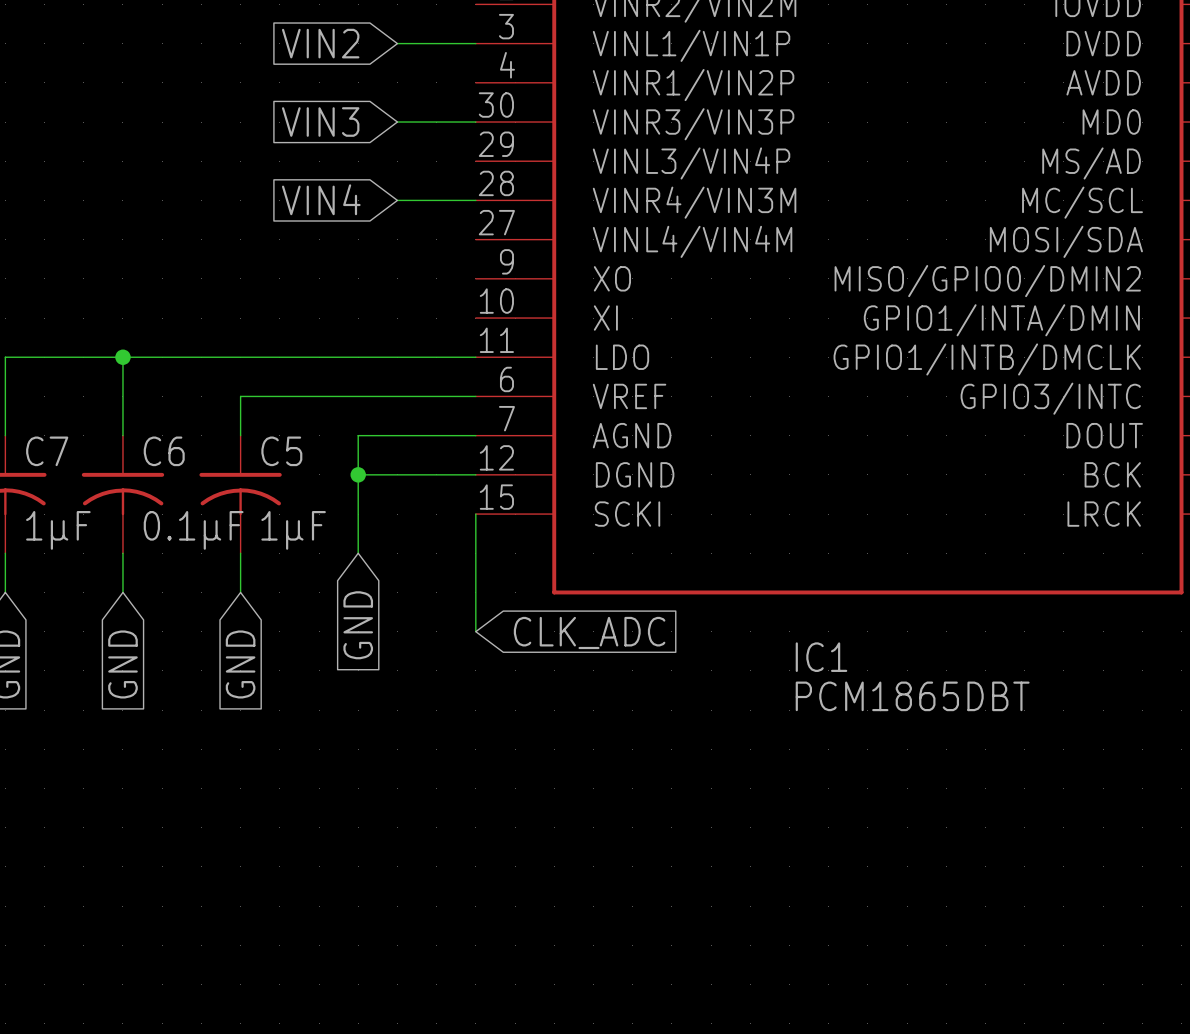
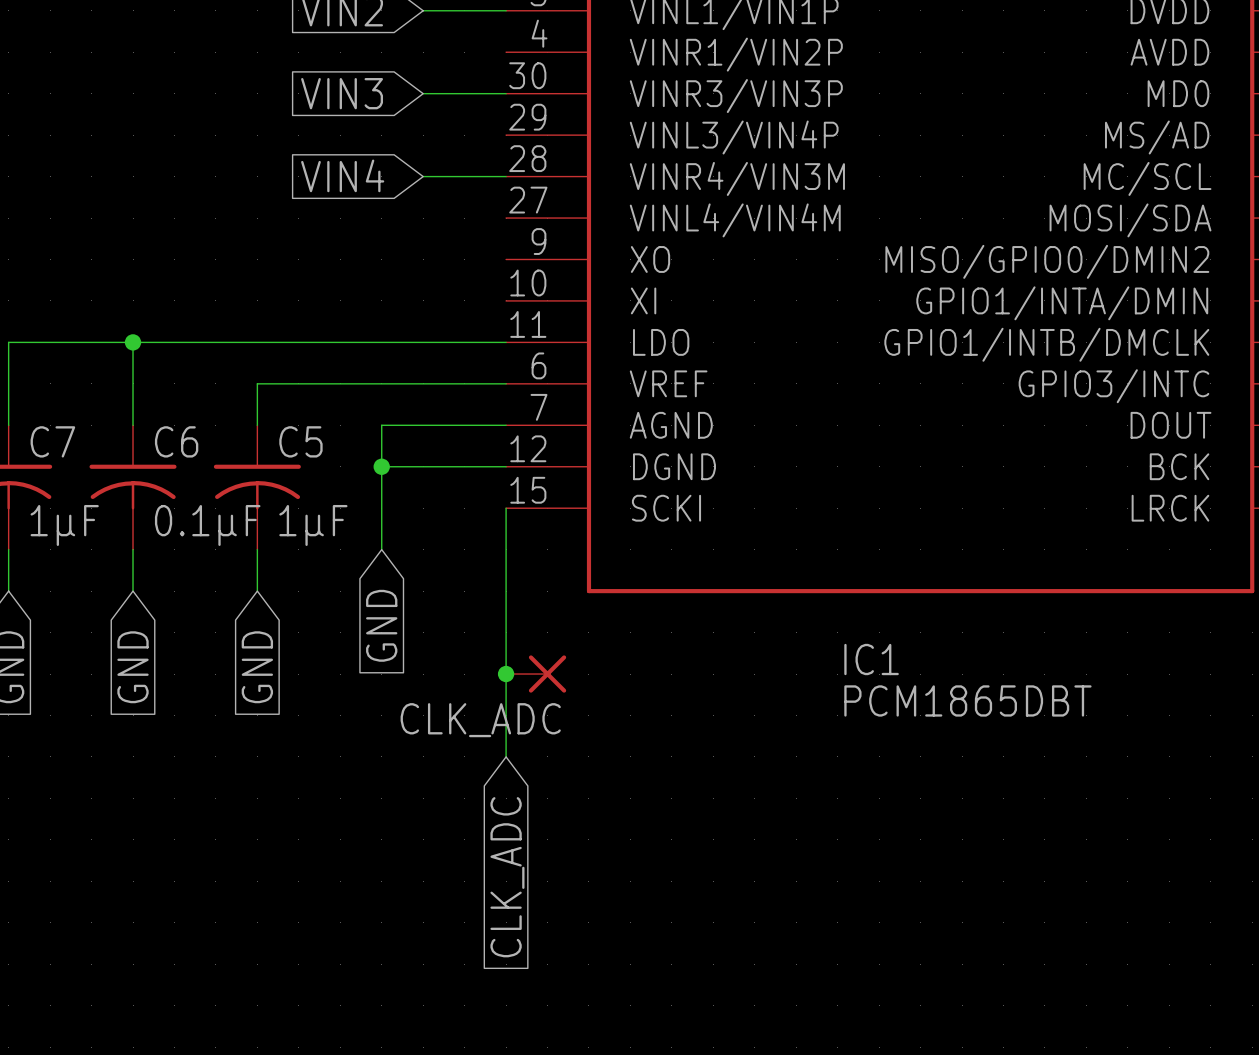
wire: none -> (506, 632) (506, 756)
global label rotation: 0° (589, 632) -> 90° clockwise (507, 877)
global label position: CLK_ADC (589, 632) -> CLK_ADC (507, 877)
junction: none -> (506, 674)
CLK_ADC: none -> (536, 674)

